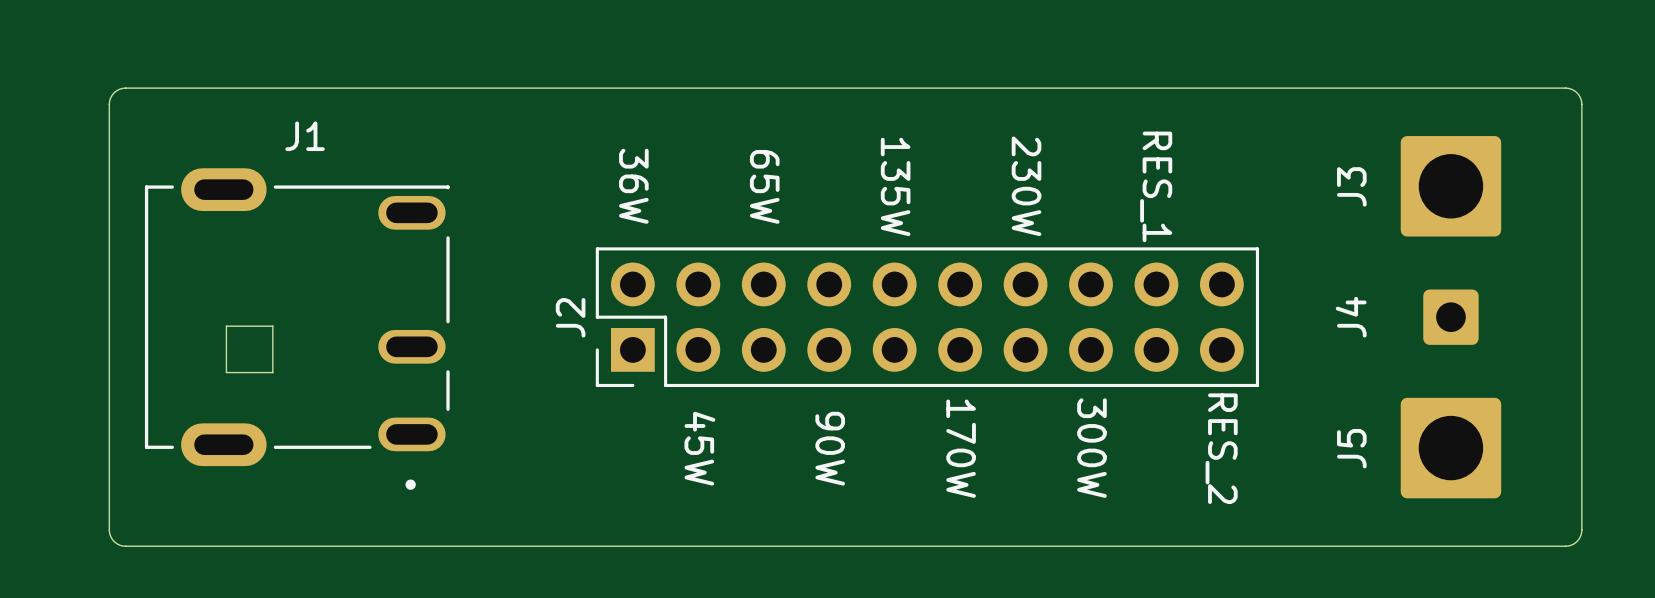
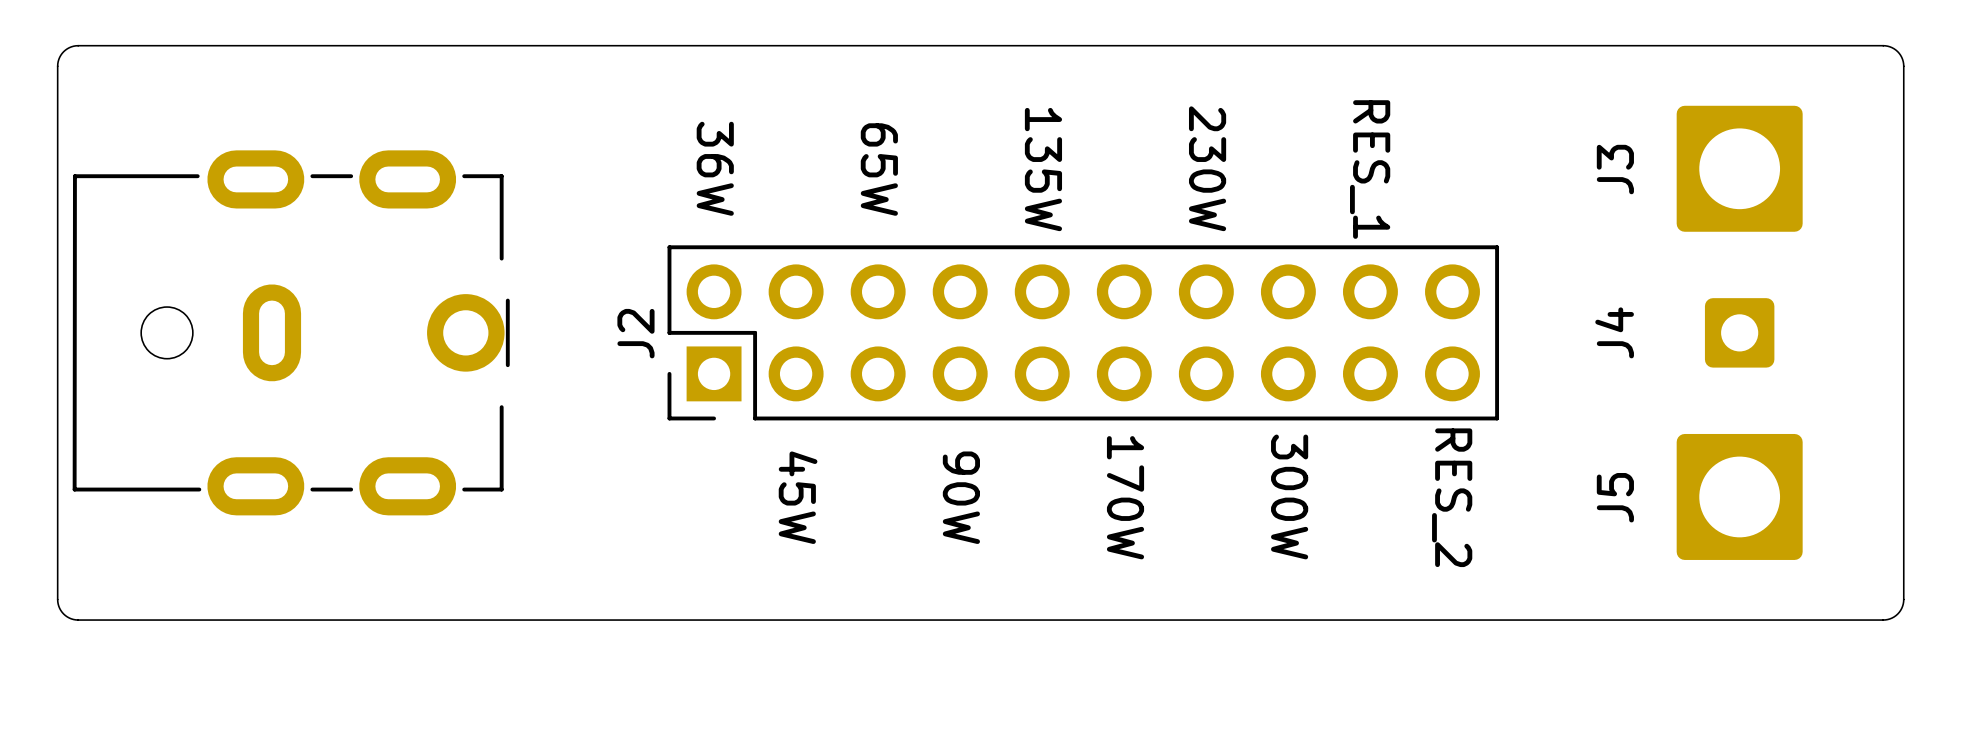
part: none -> (291, 332)
J1: (297, 329) -> none

